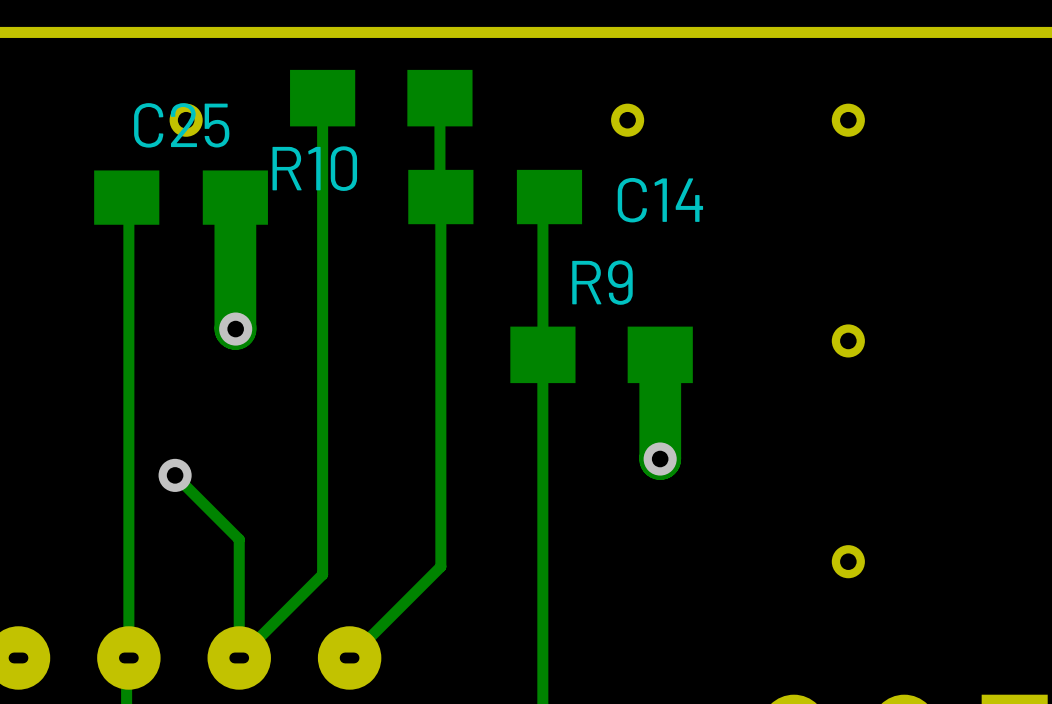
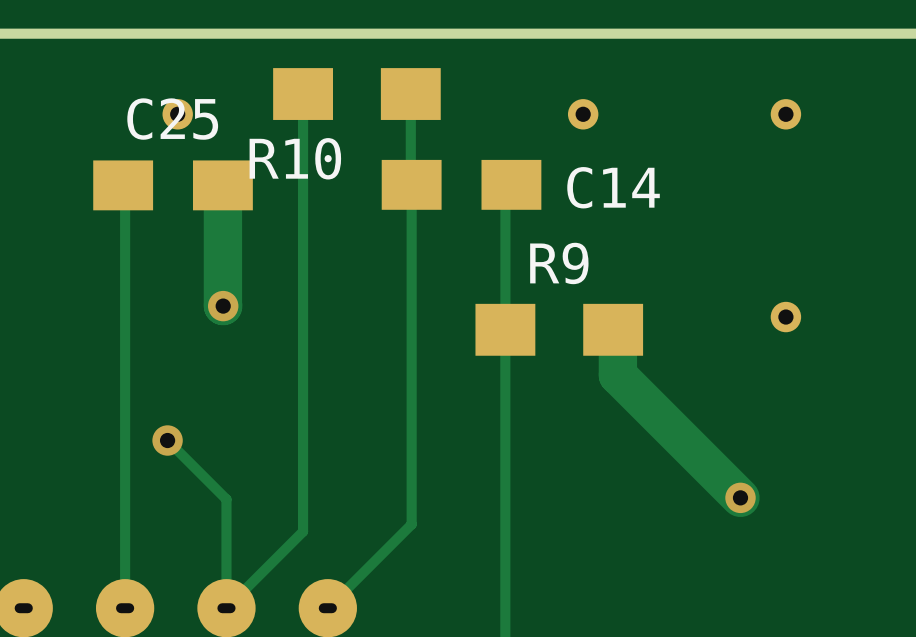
track: none -> (617, 328) (617, 375) (740, 497)
track: (660, 354) (660, 458) -> none
via position: (660, 459) -> (740, 497)
part: (848, 561) -> none

